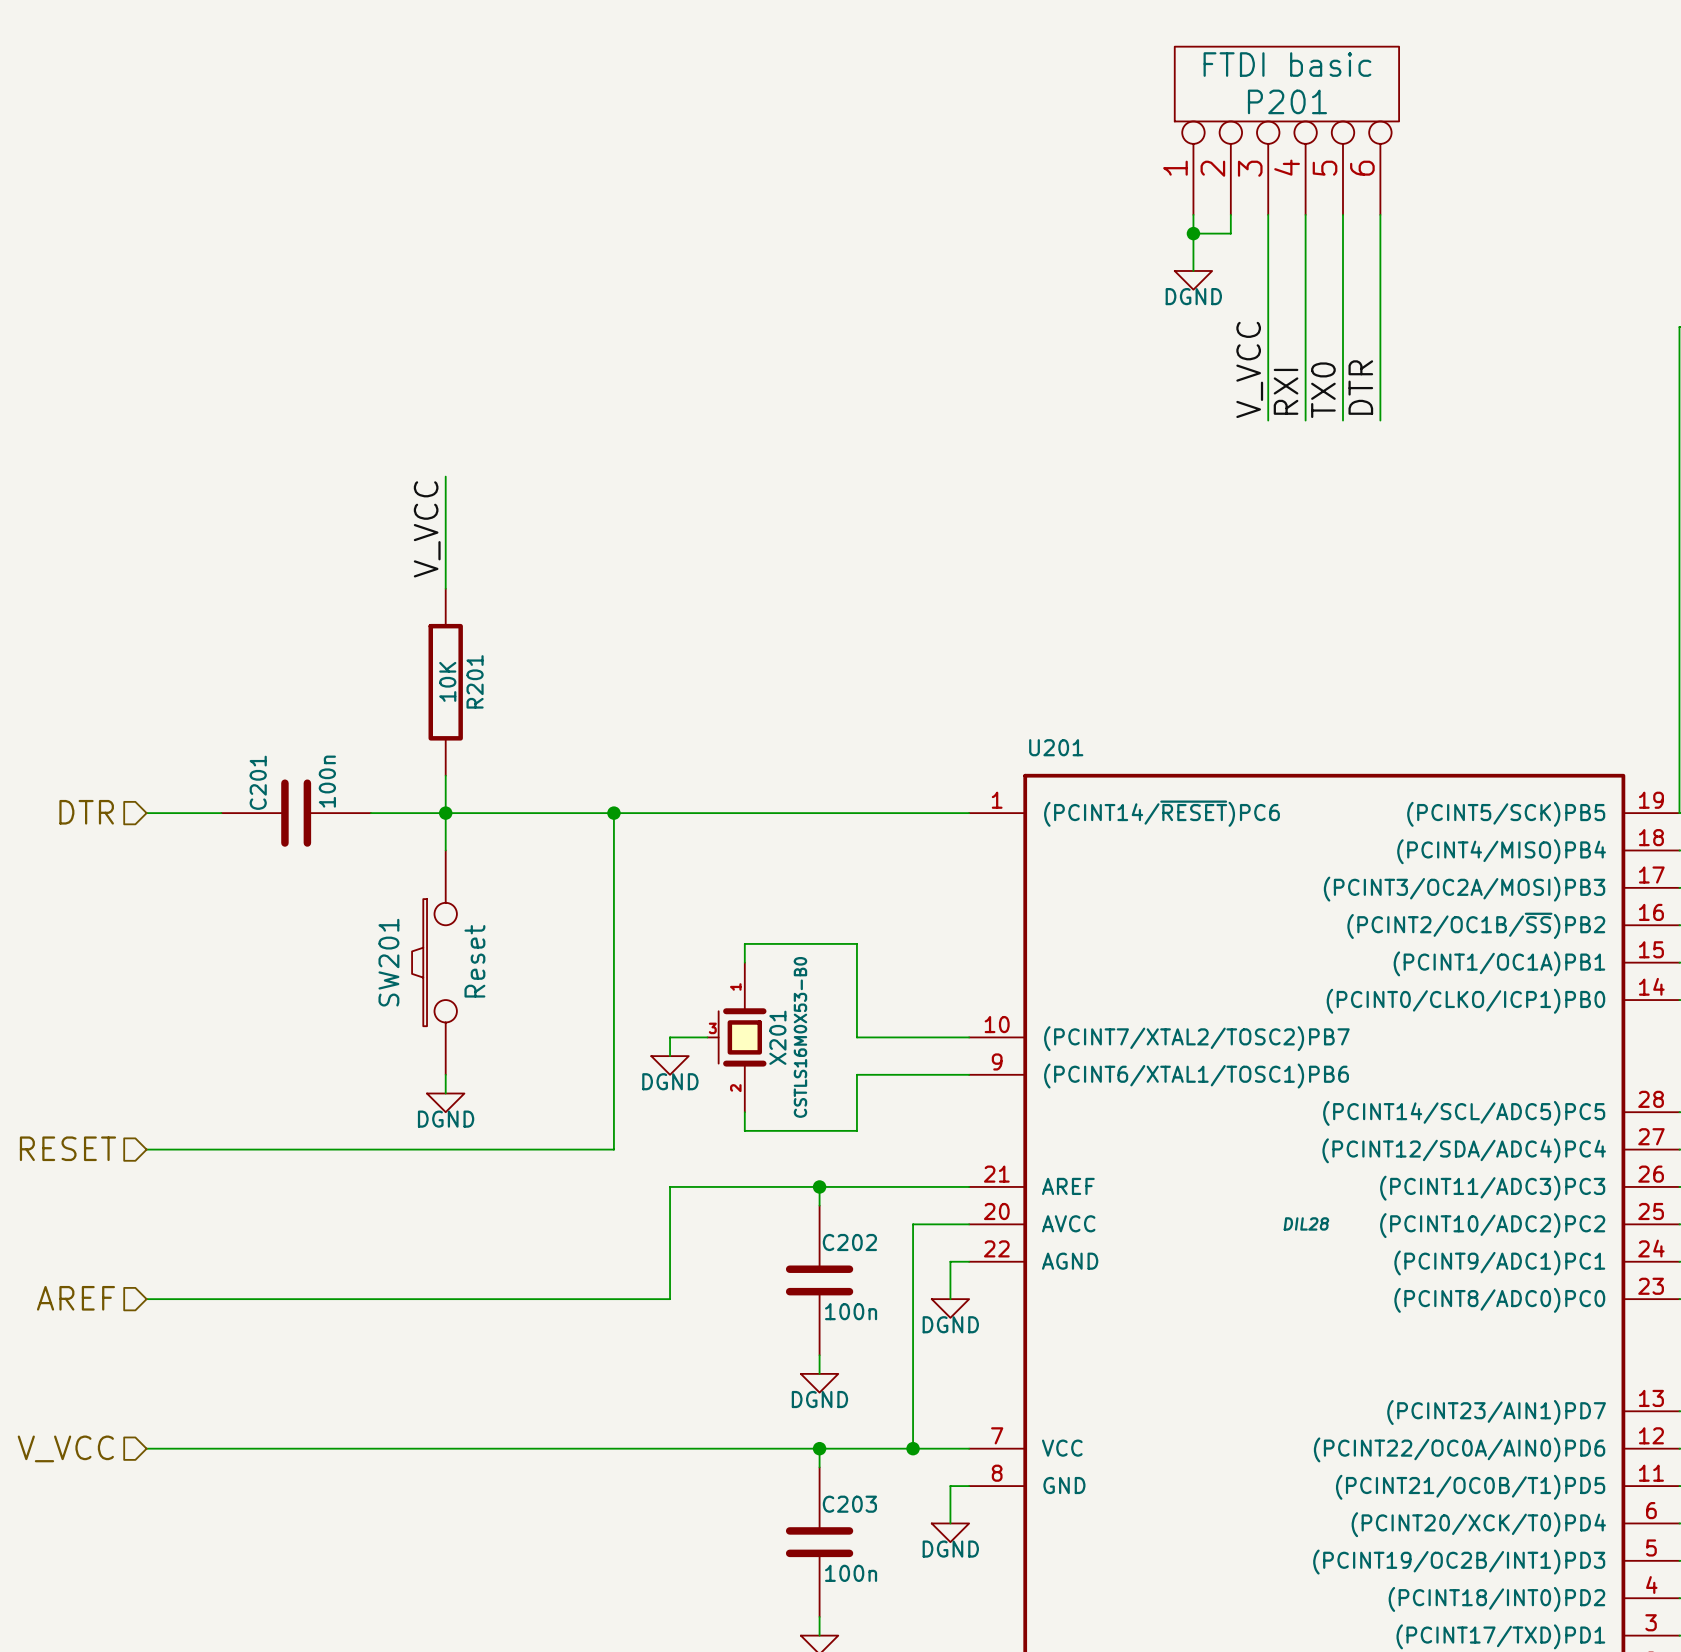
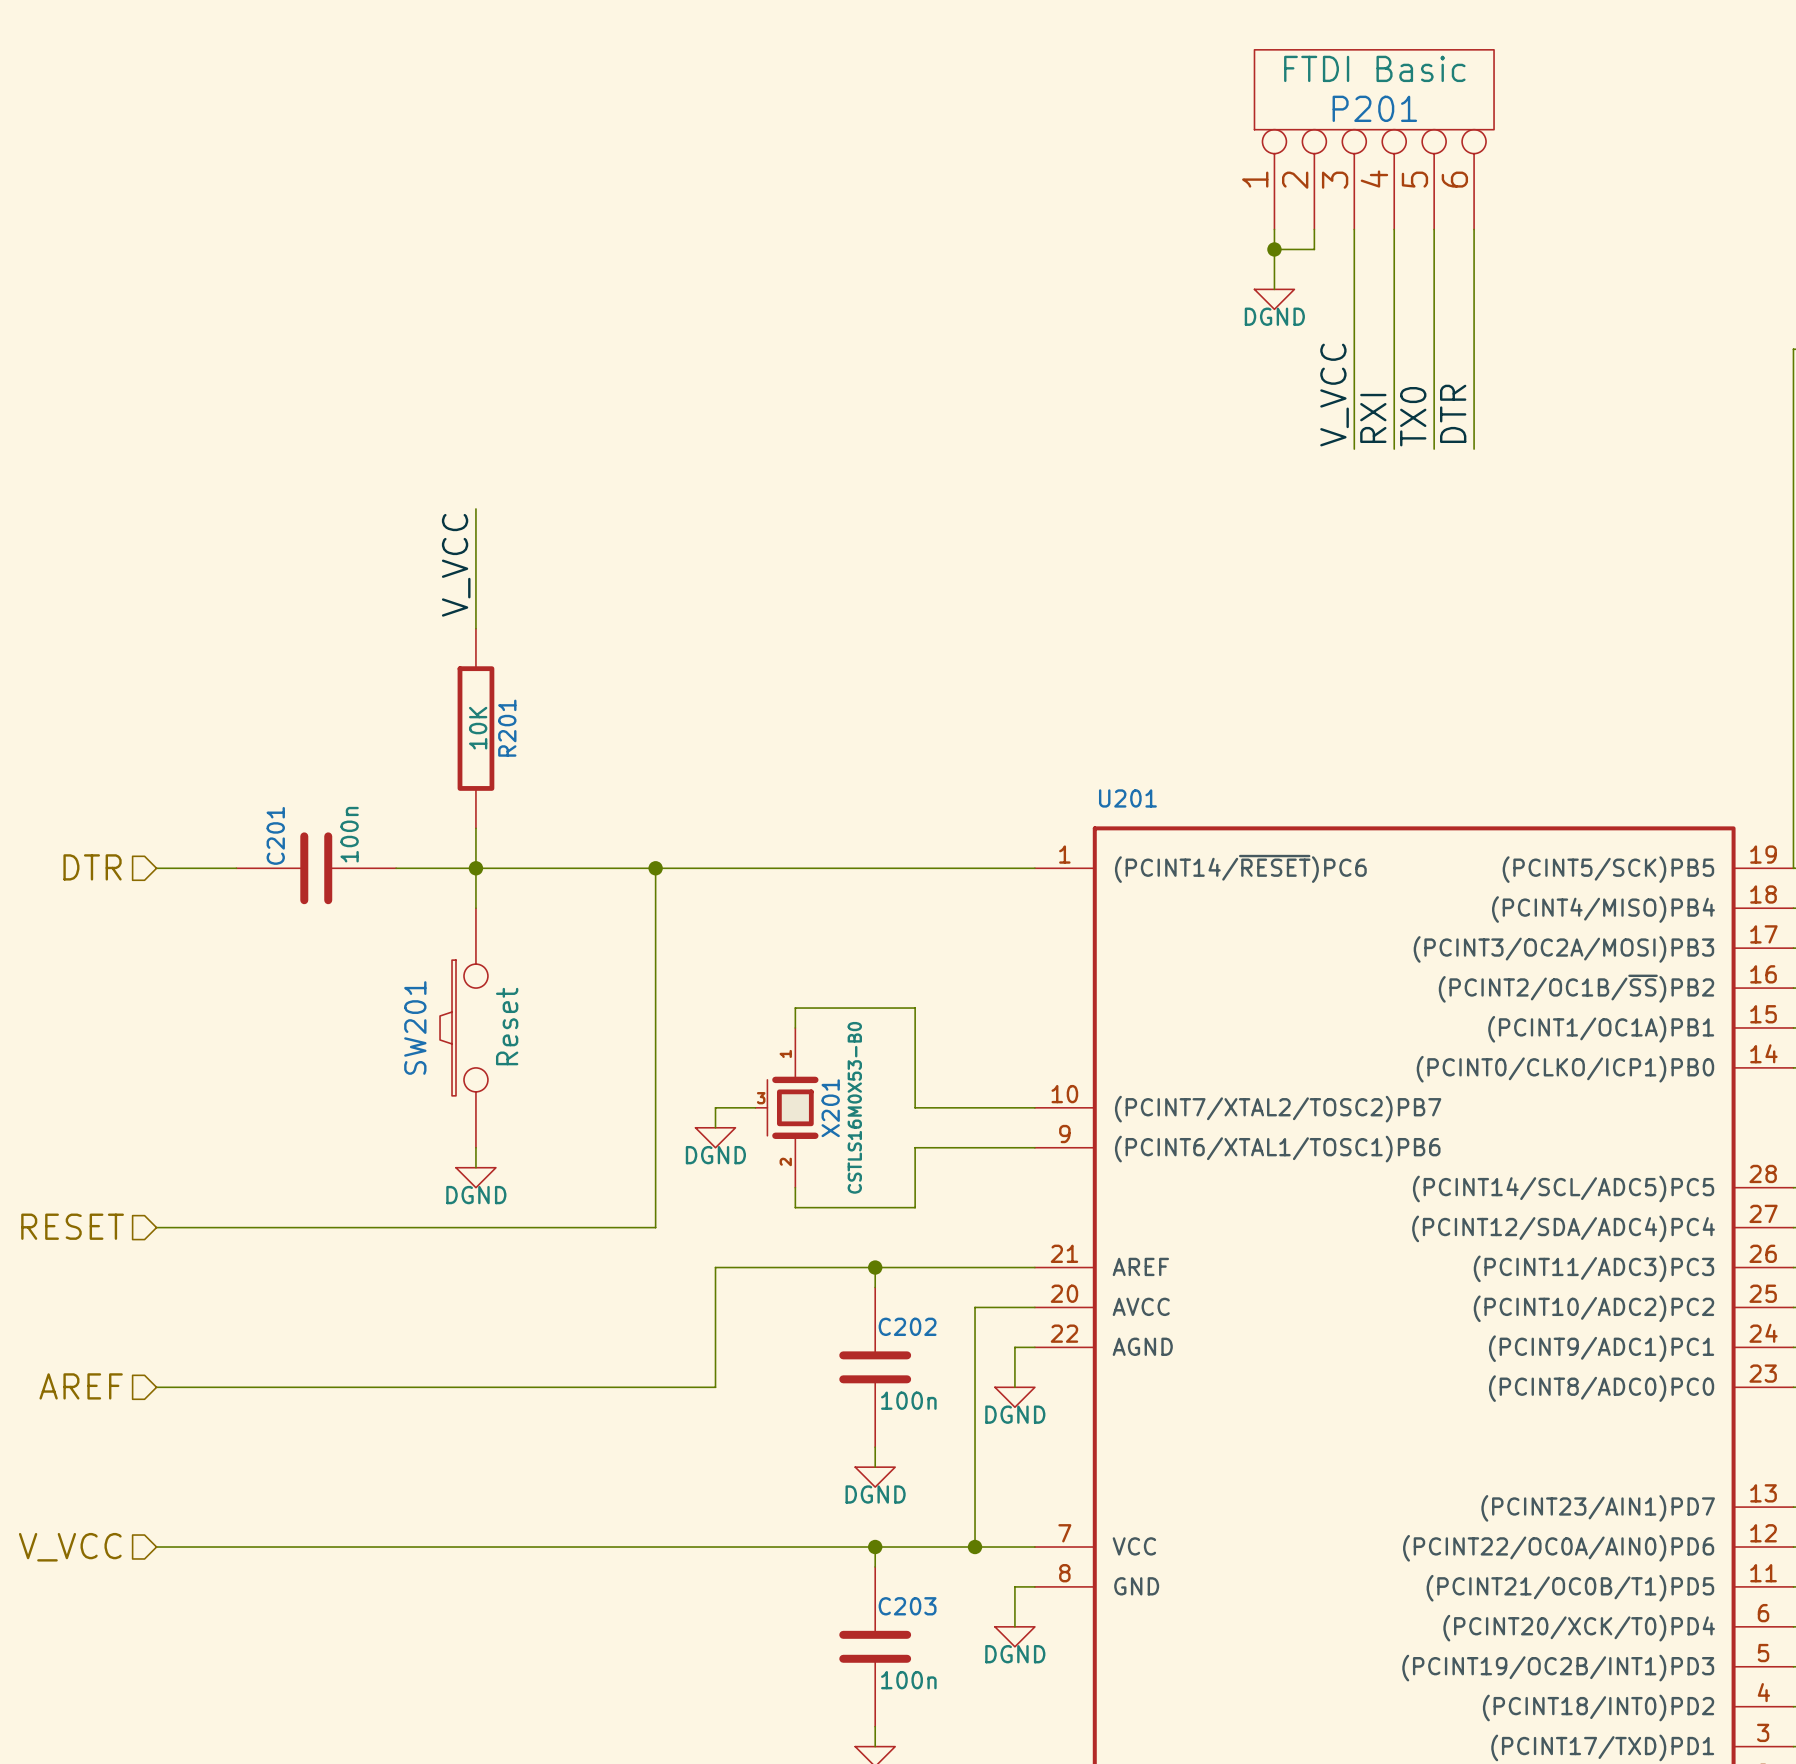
P201 value: FTDI basic (1287, 64) -> FTDI Basic (1374, 68)
U201 text: DIL28 (1306, 1223) -> none

